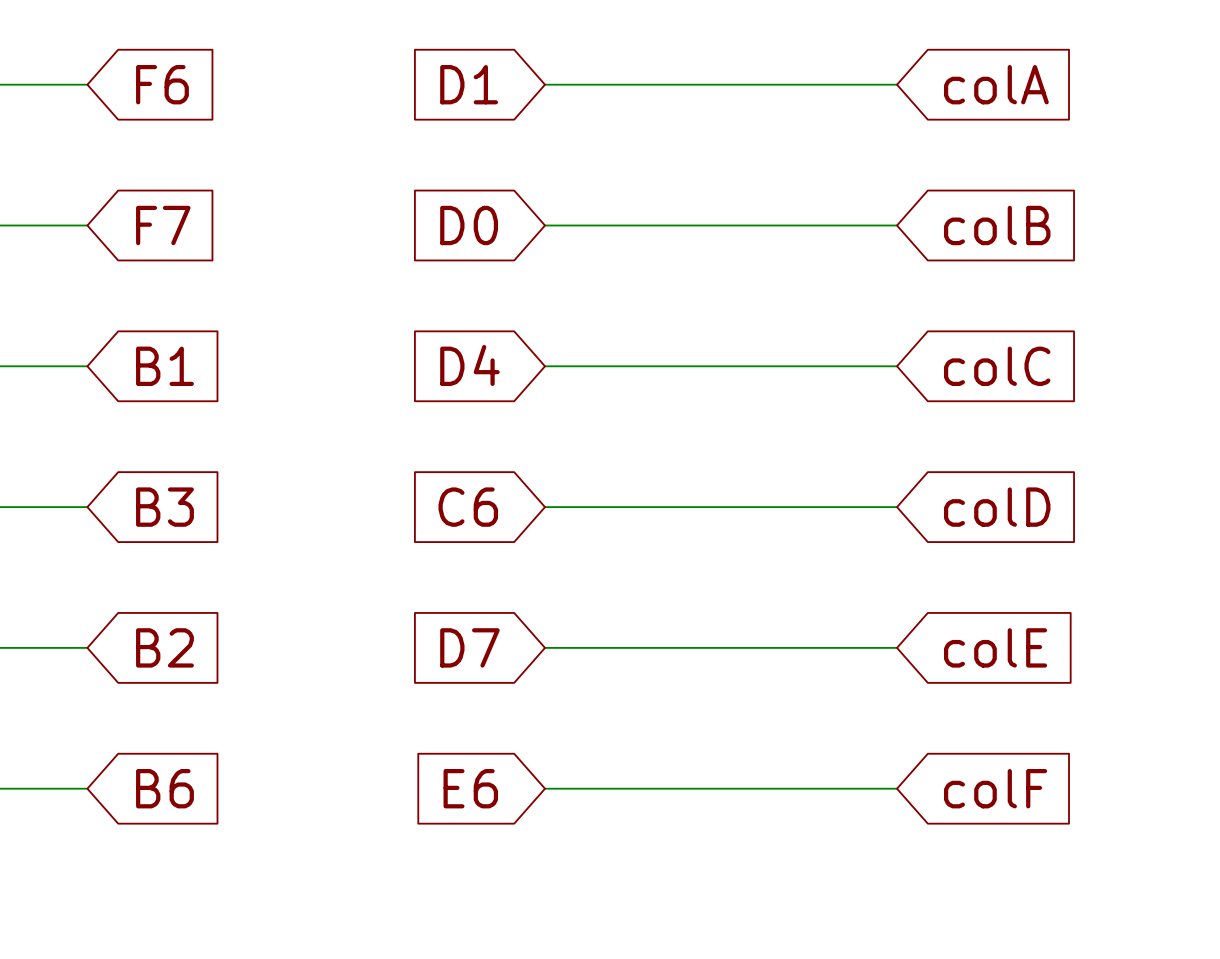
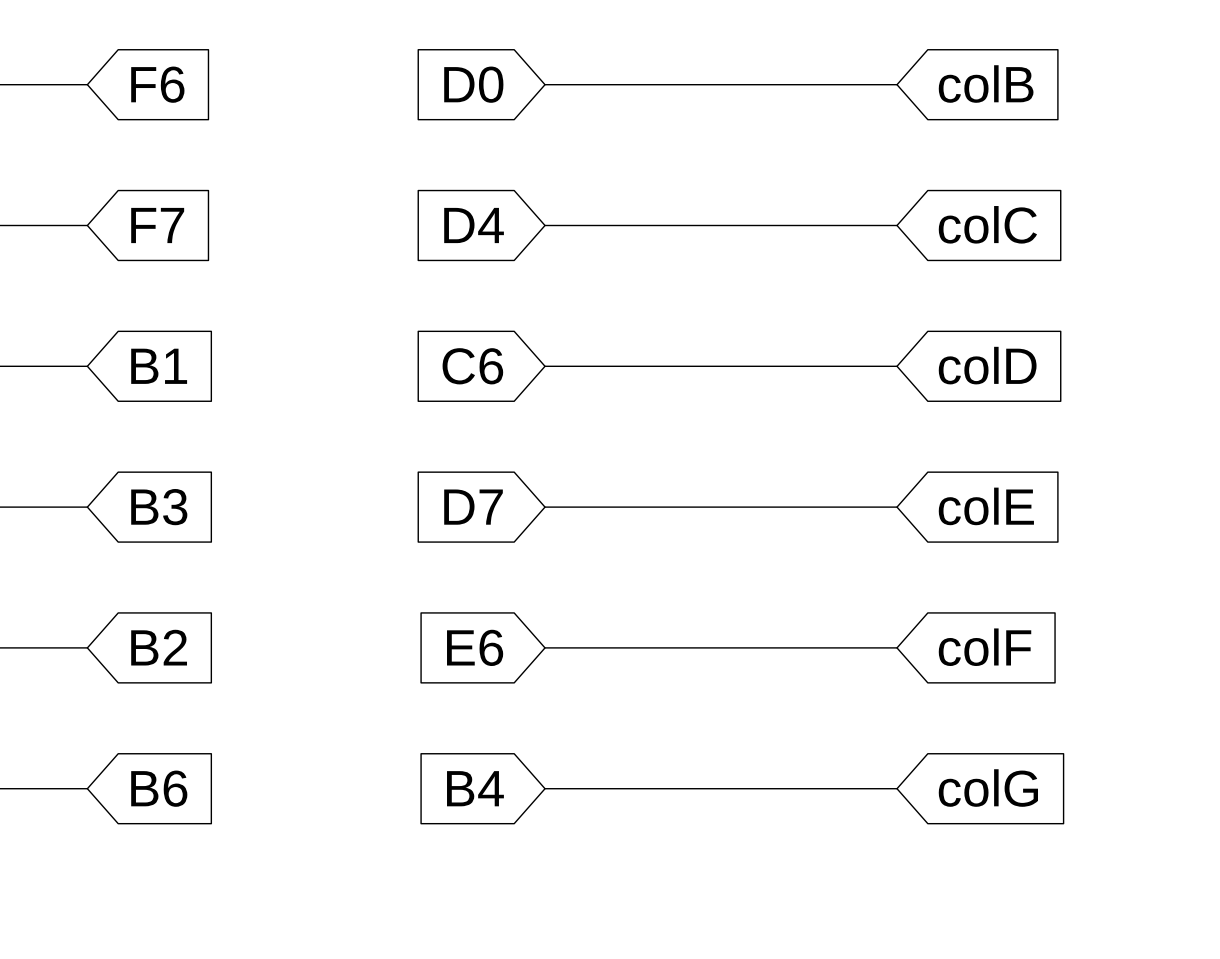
global label: D1 (469, 84) -> D0 (473, 84)
global label: colA (996, 84) -> colB (986, 84)
global label: D0 (469, 225) -> D4 (474, 225)
global label: colB (997, 225) -> colC (987, 224)
global label: D4 (469, 365) -> C6 (472, 366)
global label: colC (997, 366) -> colD (987, 365)
global label: C6 (468, 507) -> D7 (473, 507)
global label: colD (997, 507) -> colE (986, 506)
global label: D7 (469, 647) -> E6 (475, 647)
global label: colE (995, 647) -> colF (985, 647)
global label: E6 (470, 788) -> B4 (475, 788)
global label: colF (995, 788) -> colG (988, 788)

